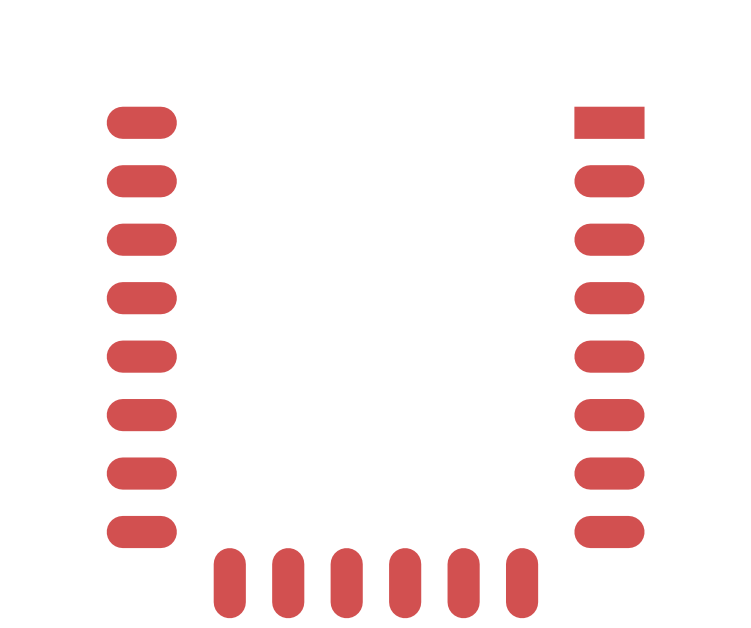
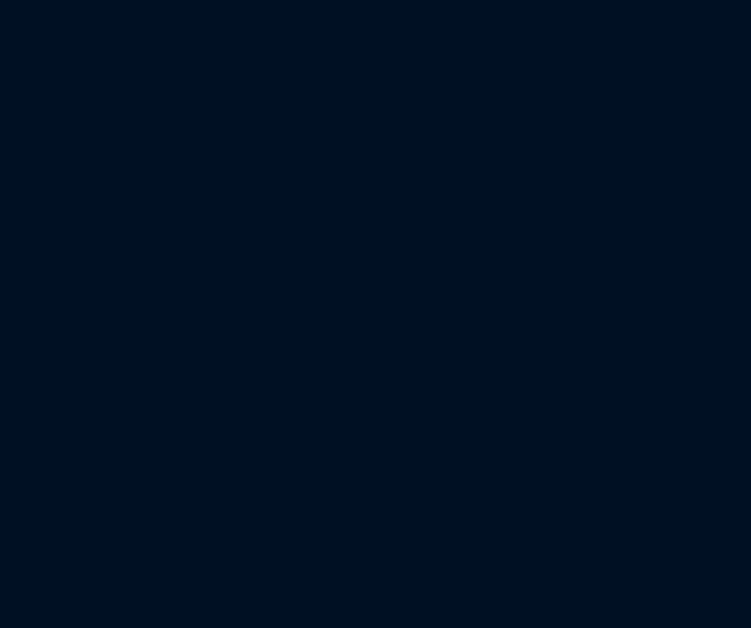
part: (375, 362) -> none

